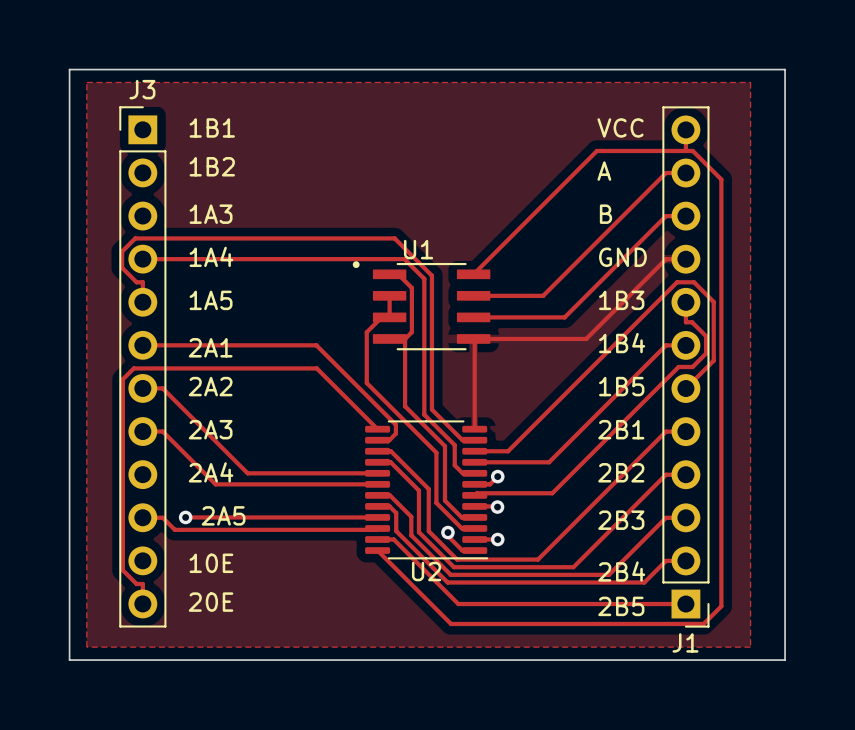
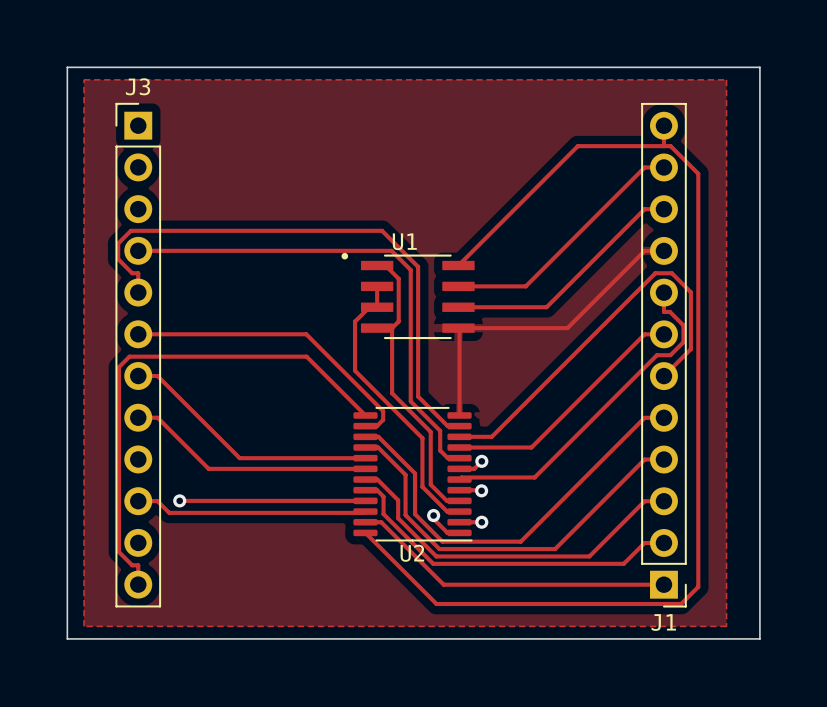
text: 1B1 (212, 127) -> none
text: VCC (620, 127) -> none
text: 1B2 (212, 166) -> none
text: A (604, 171) -> none
text: 1A3 (211, 214) -> none
text: B (605, 214) -> none
text: 1A4 (211, 256) -> none
text: GND (622, 257) -> none
text: 1A5 (211, 300) -> none
text: 1B3 (621, 300) -> none
text: 1B4 (622, 343) -> none
text: 2A1 (210, 347) -> none
text: 2A2 (210, 386) -> none
text: 1B5 (621, 386) -> none
text: 2A3 (210, 429) -> none
text: 2B1 (621, 429) -> none
text: 2A4 (211, 472) -> none
text: 2B2 (621, 472) -> none
text: 2A5 (223, 515) -> none
text: 2B3 (621, 520) -> none
text: 10E (211, 563) -> none
text: 2B4 (621, 571) -> none
text: 20E (211, 602) -> none
text: 2B5 (621, 606) -> none

